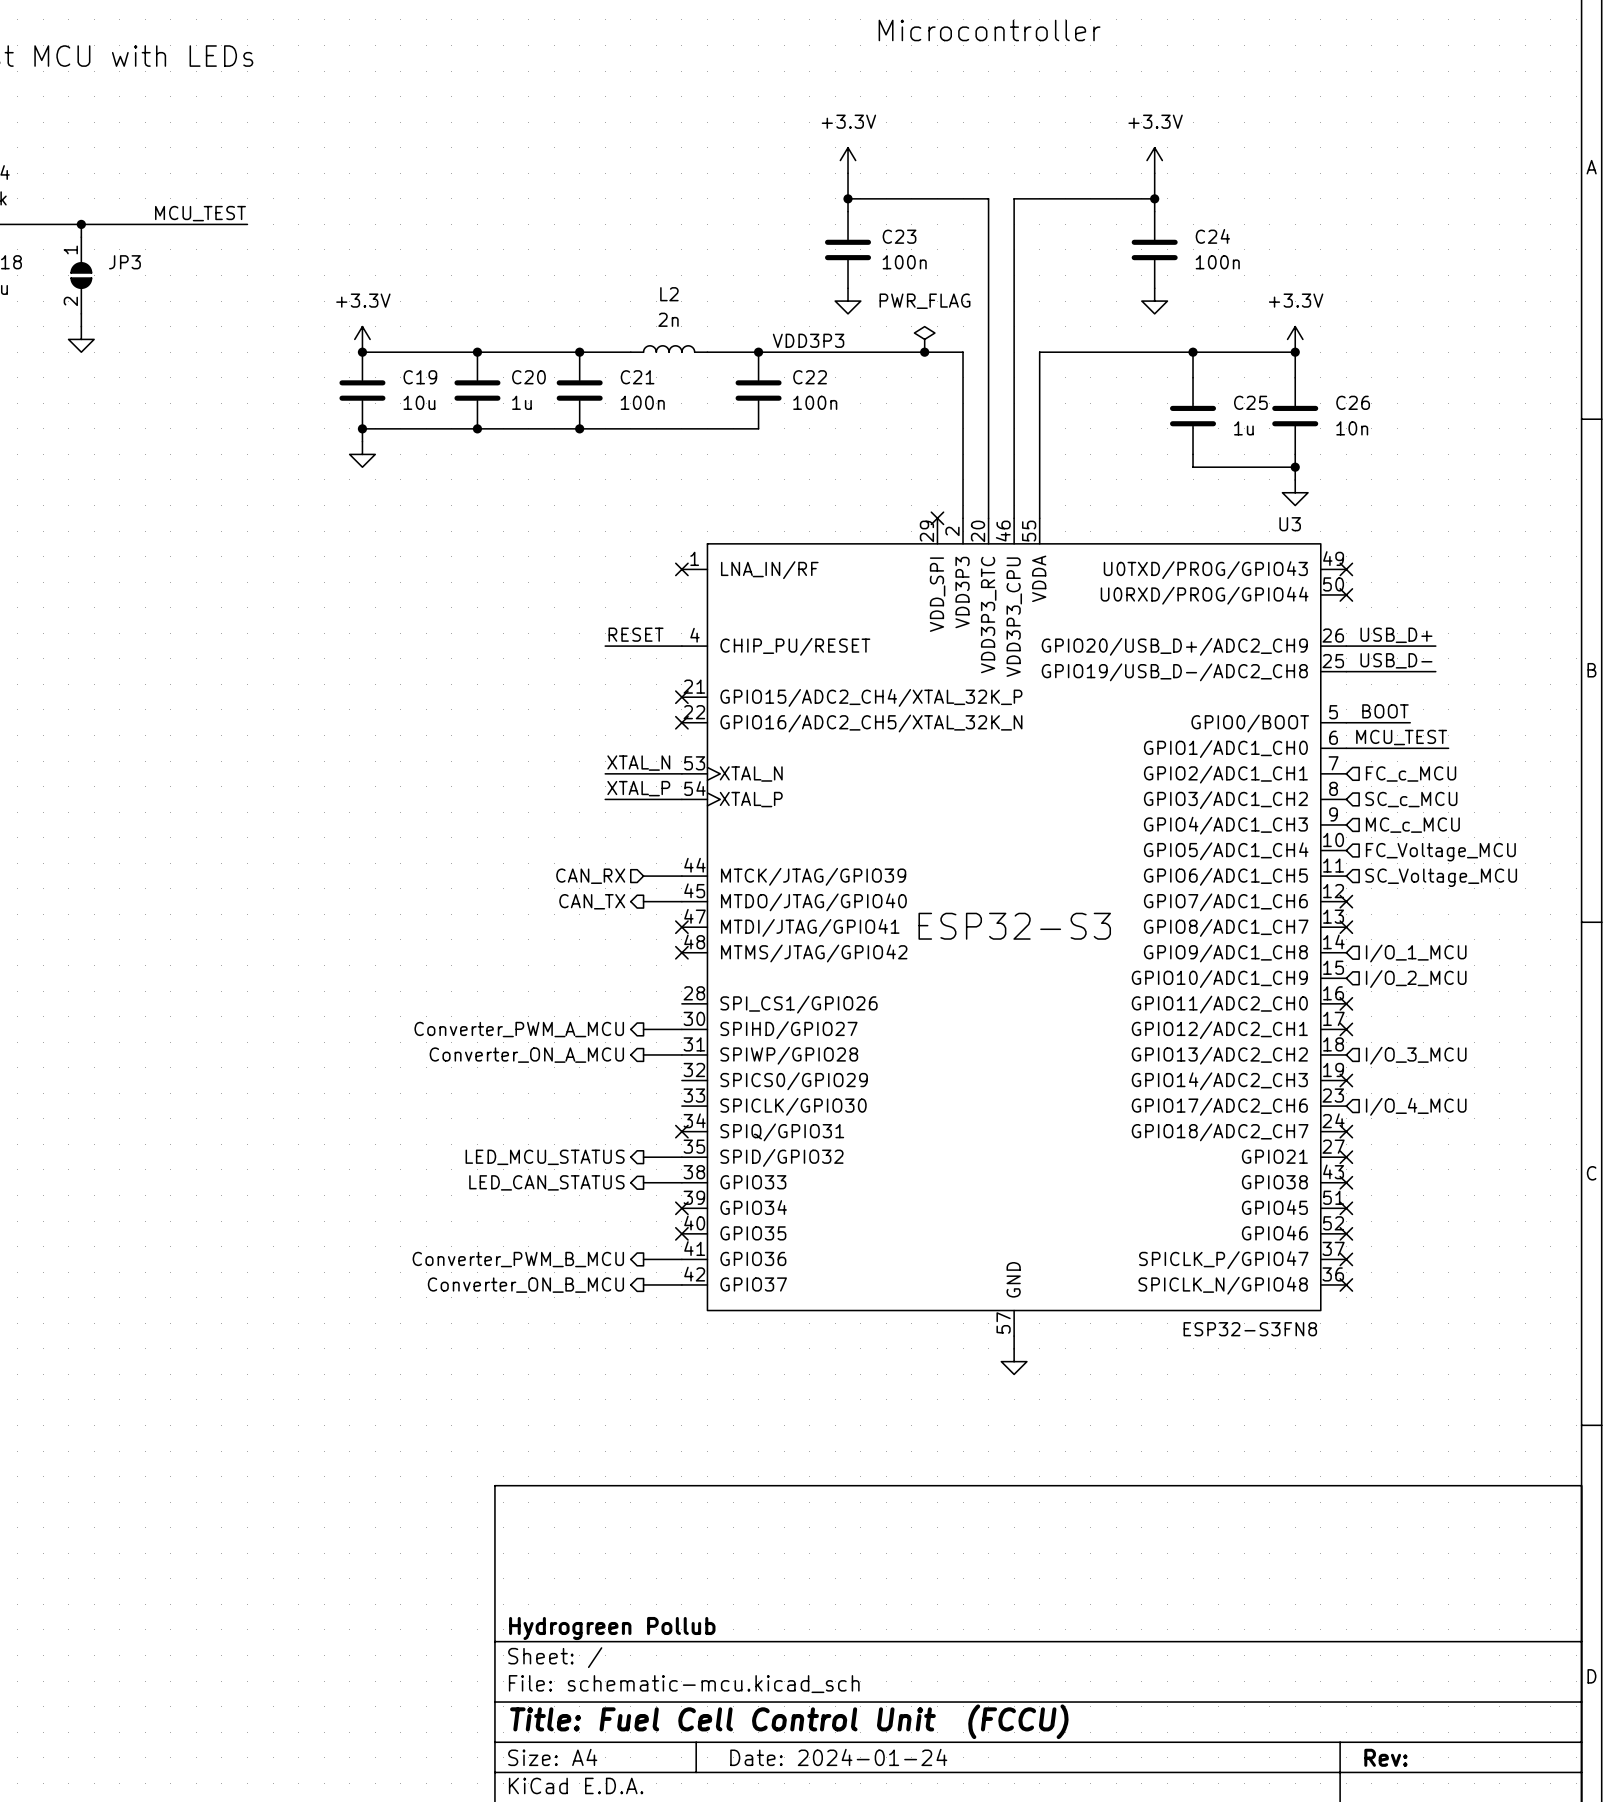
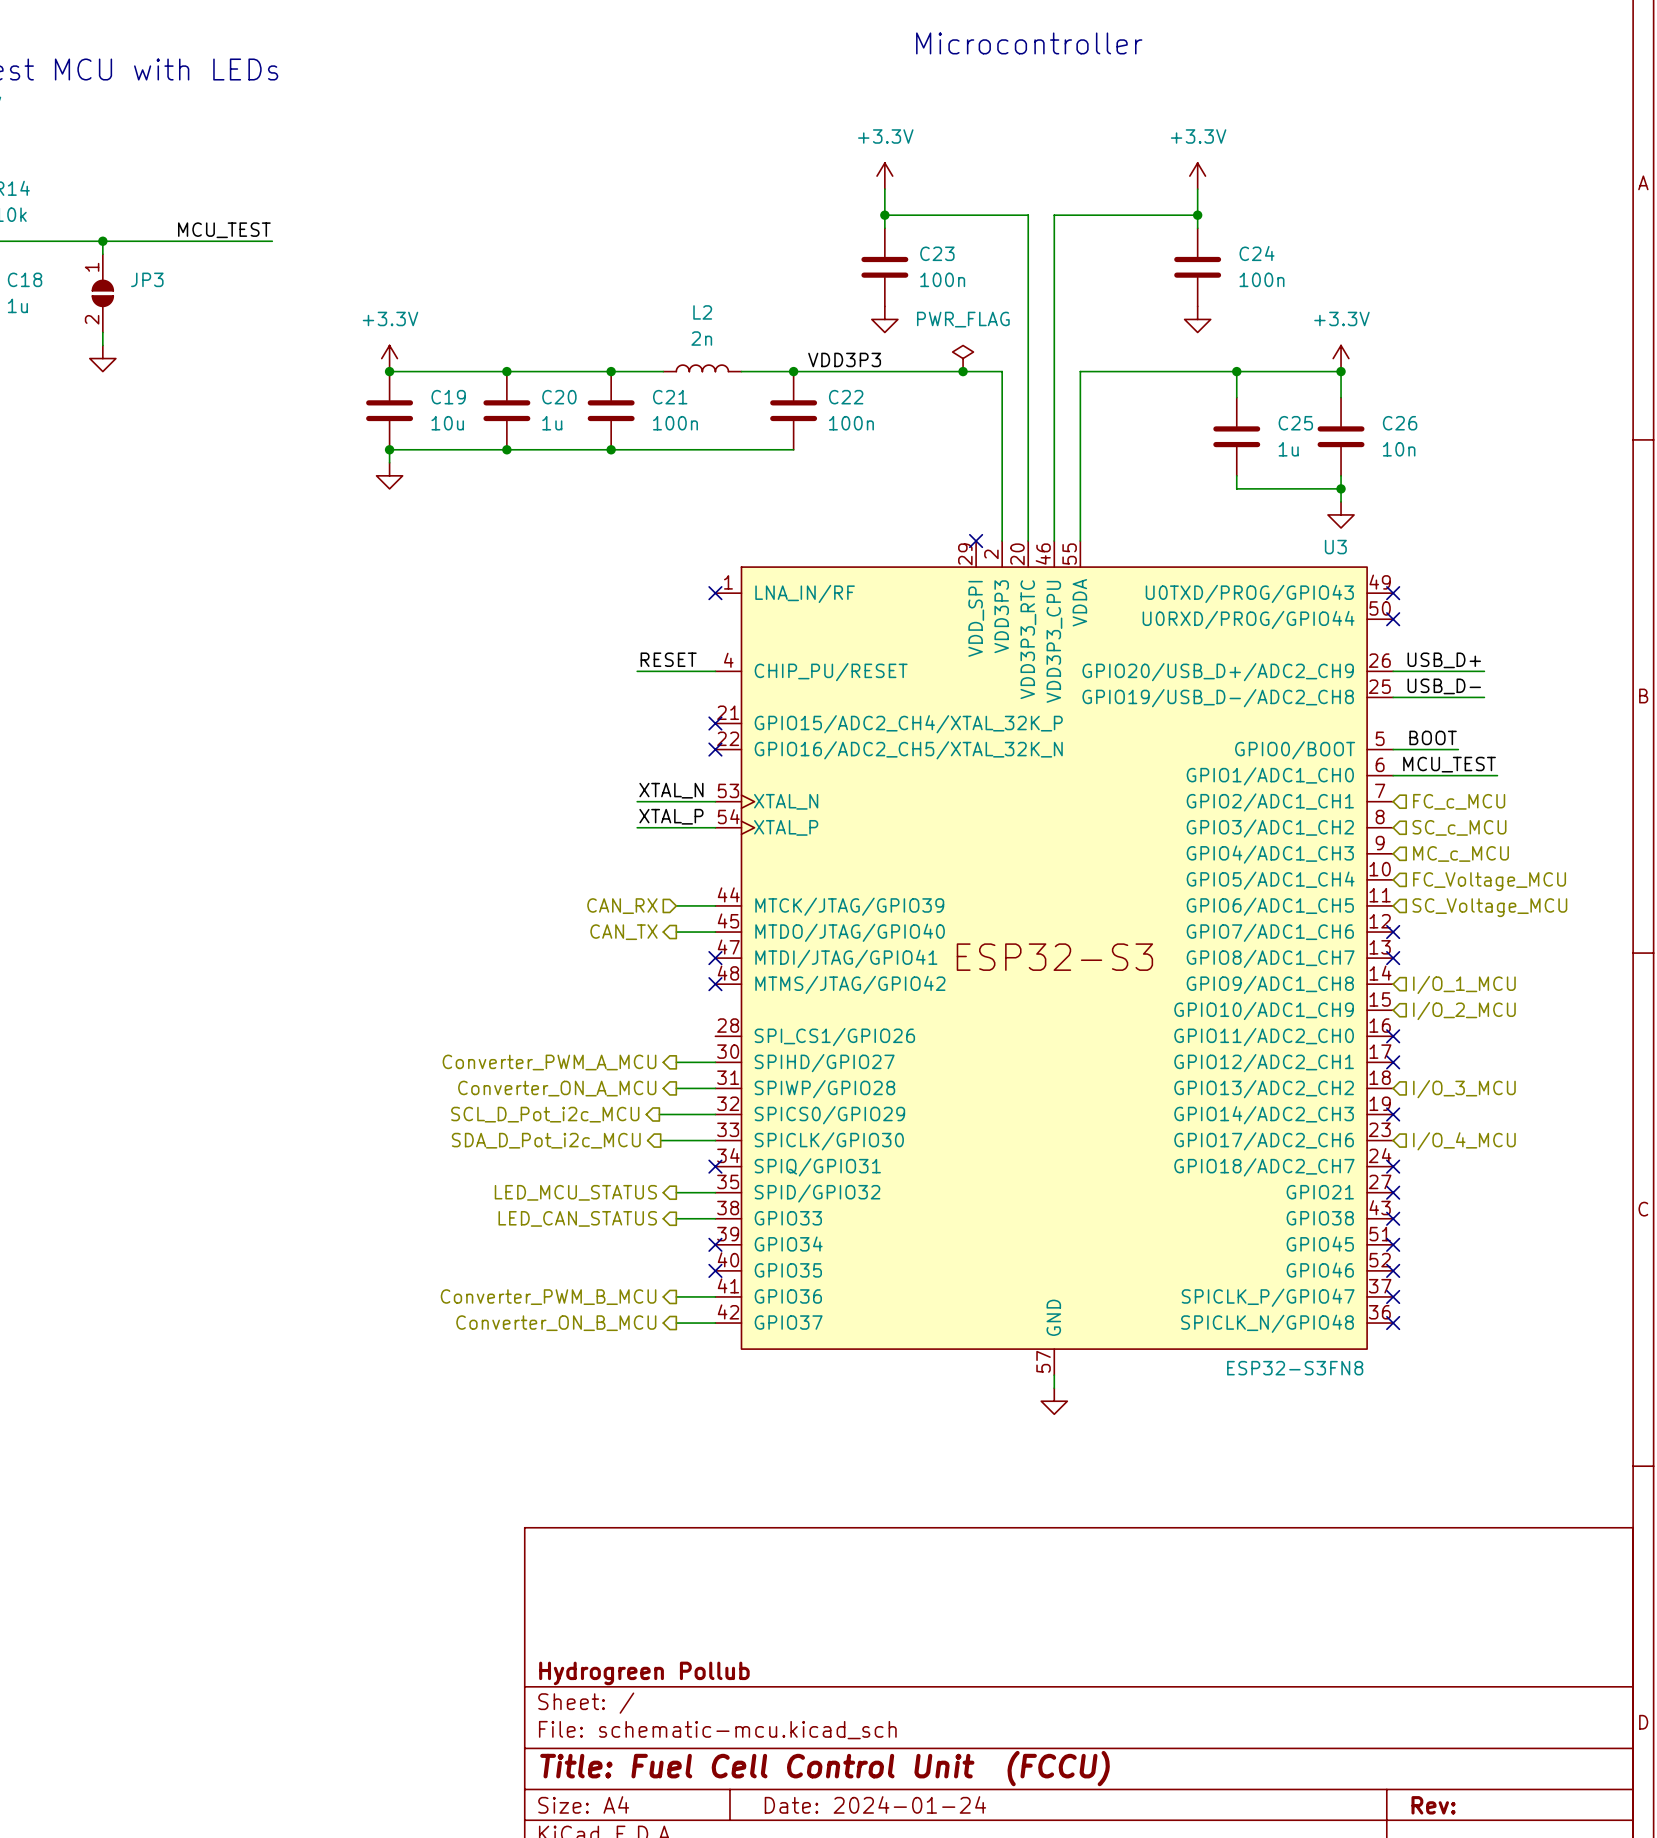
hierarchical label: none -> SCL_D_Pot_i2c_MCU (545, 1114)
wire: none -> (659, 1114) (715, 1114)
hierarchical label: none -> SDA_D_Pot_i2c_MCU (546, 1140)
wire: none -> (660, 1140) (715, 1140)

